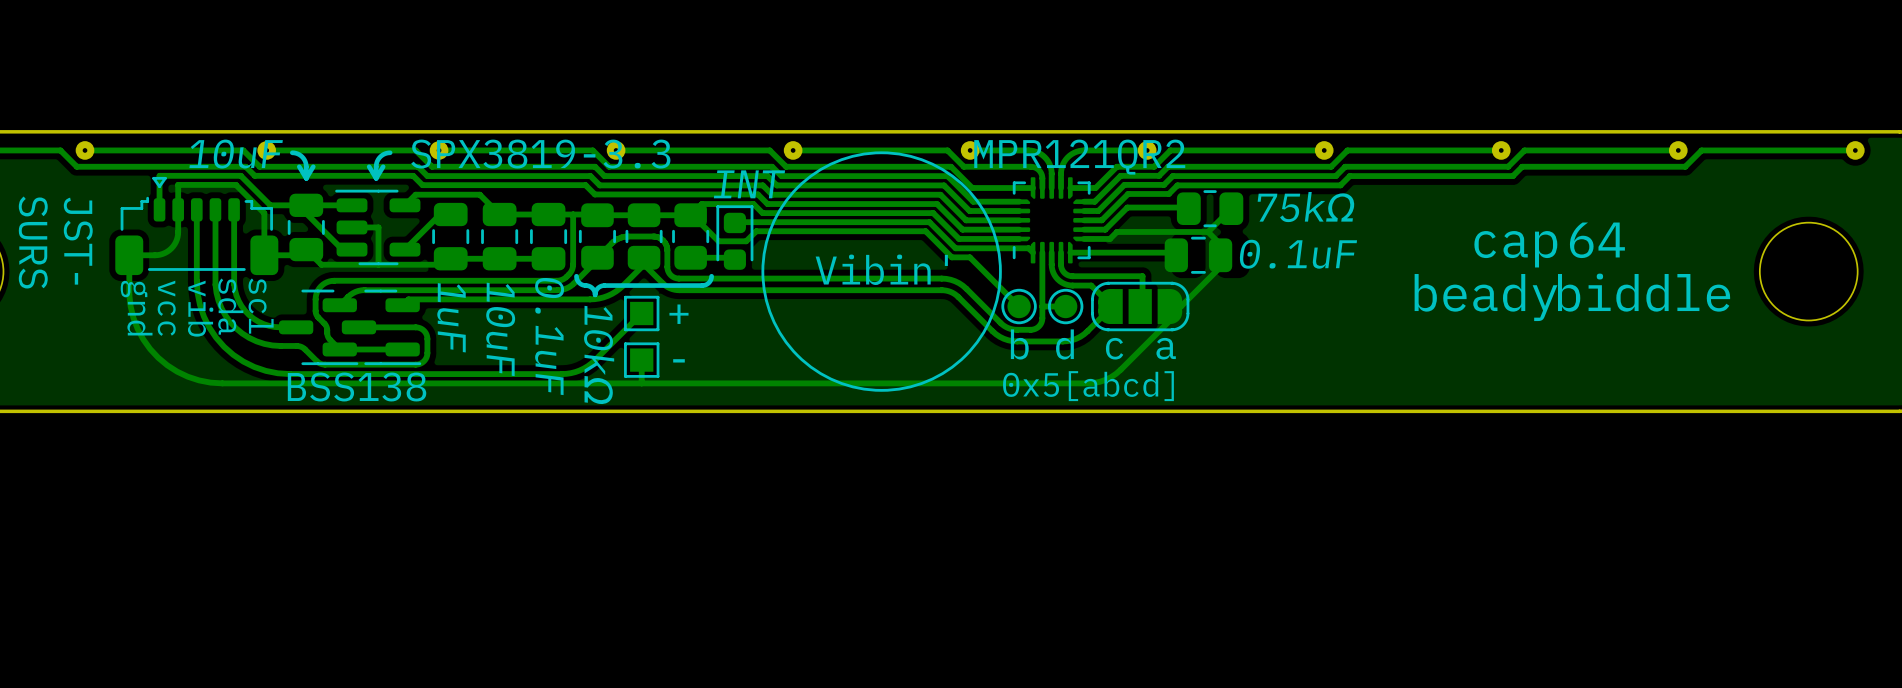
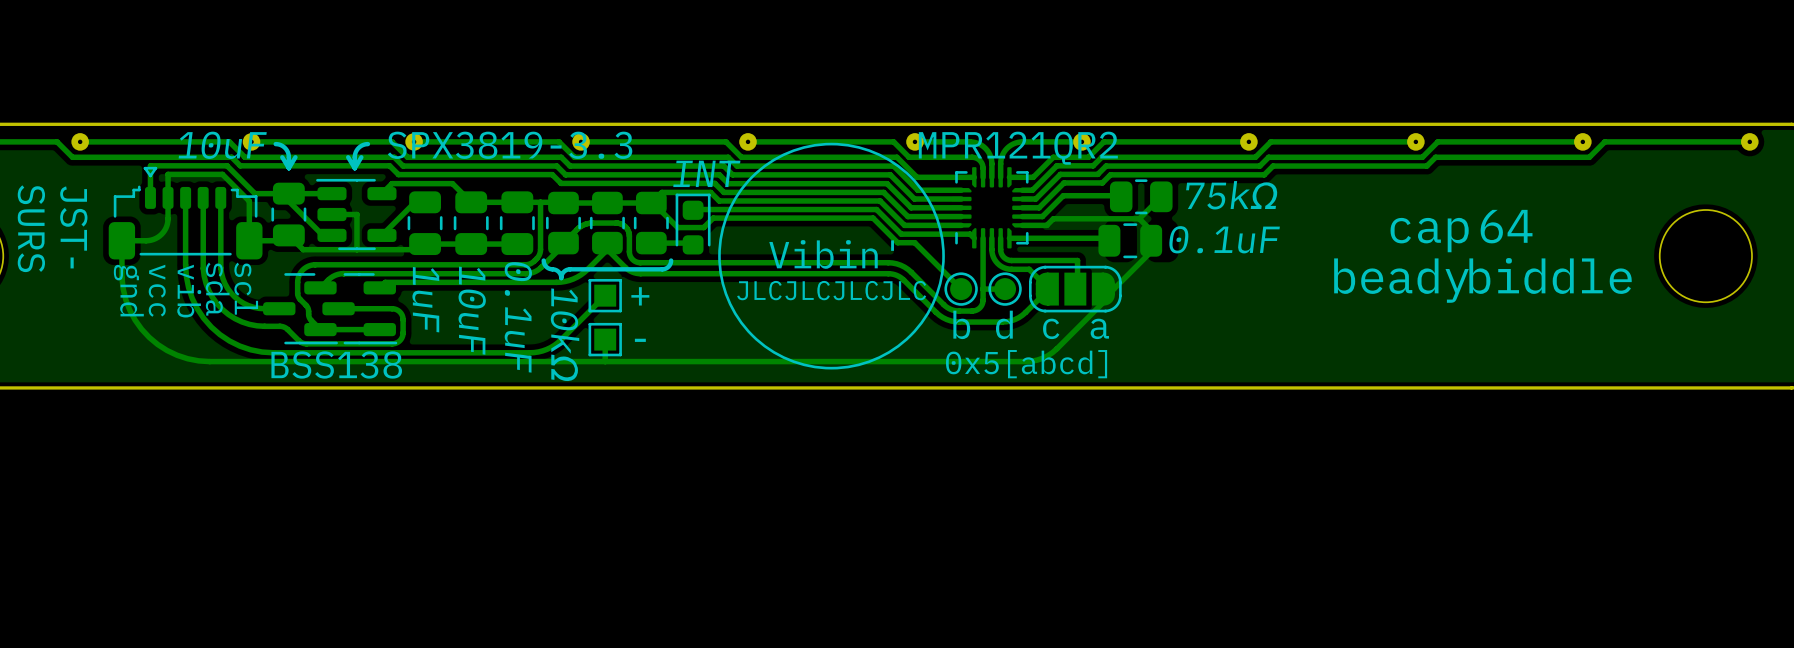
text: none -> JLCJLCJLCJLC (831, 290)

